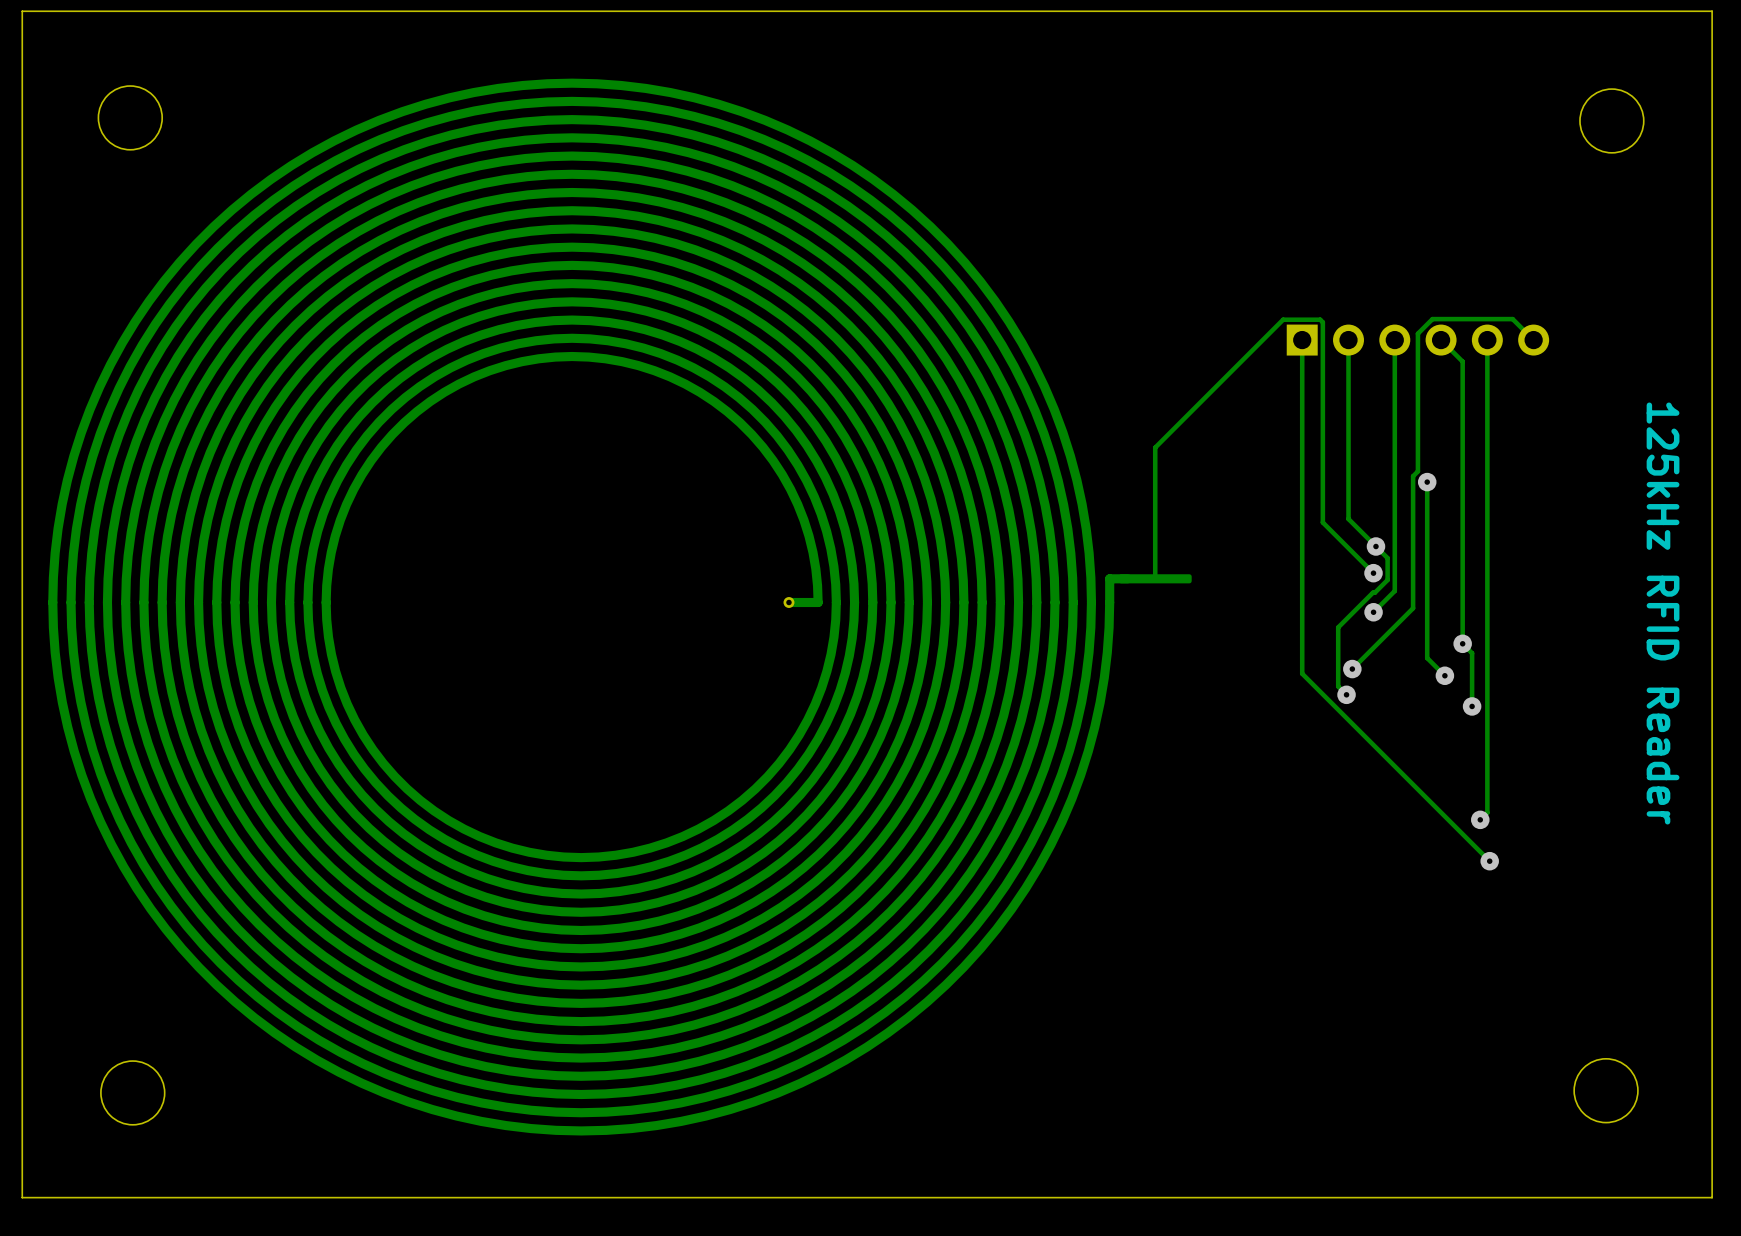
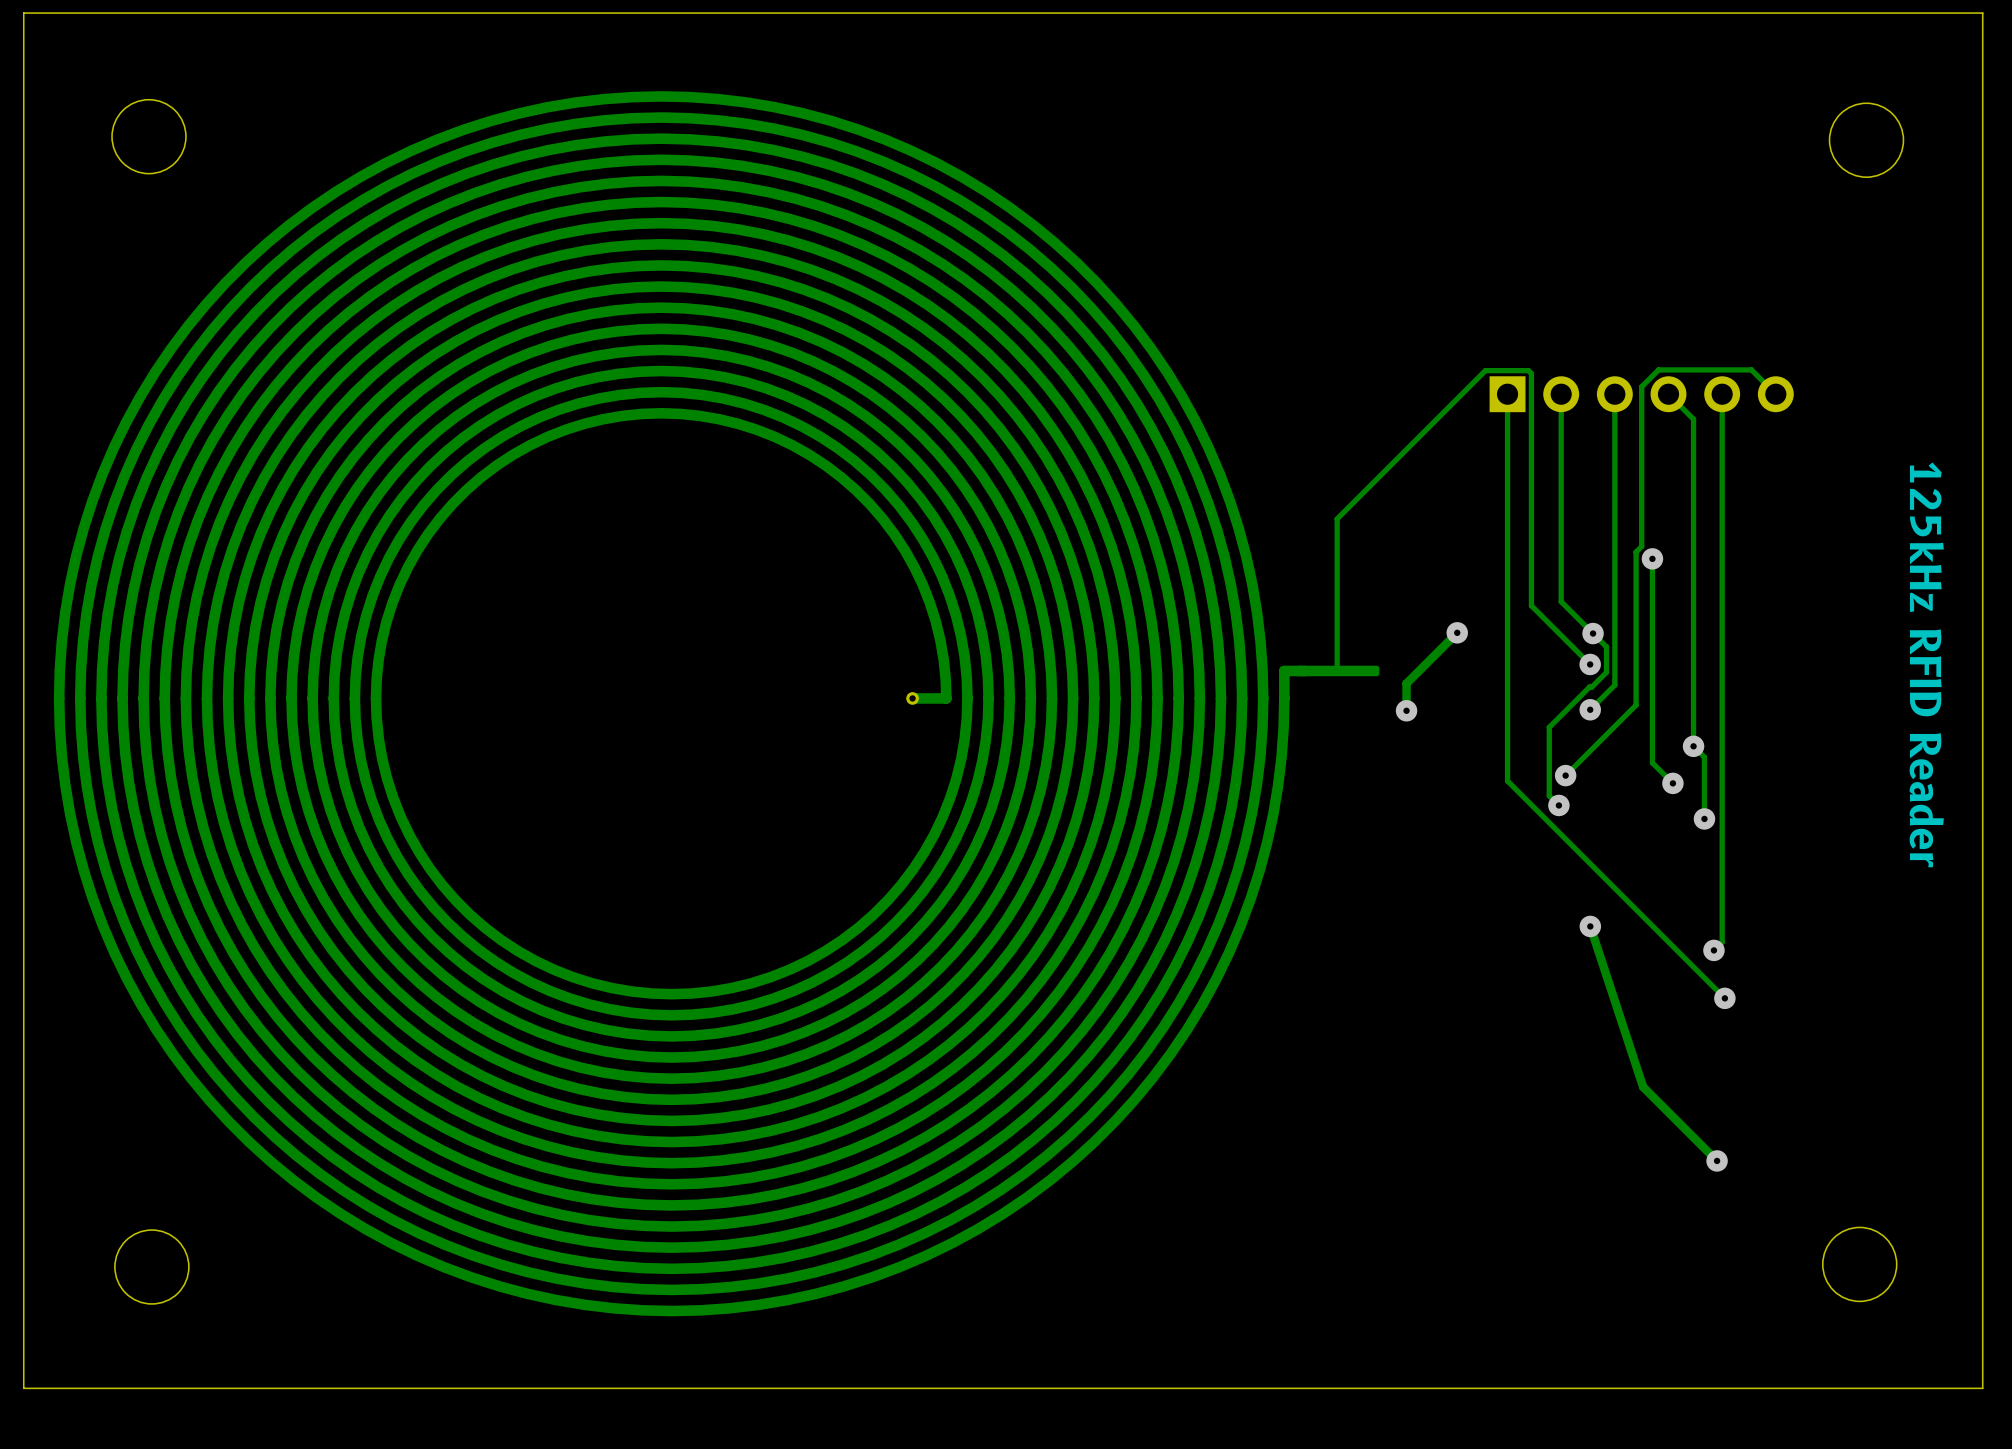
track: none -> (1457, 632) (1406, 683) (1406, 710)
via: none -> (1457, 632)
via: none -> (1406, 710)
track: none -> (1590, 926) (1643, 1087) (1717, 1160)
via: none -> (1590, 926)
via: none -> (1717, 1160)

